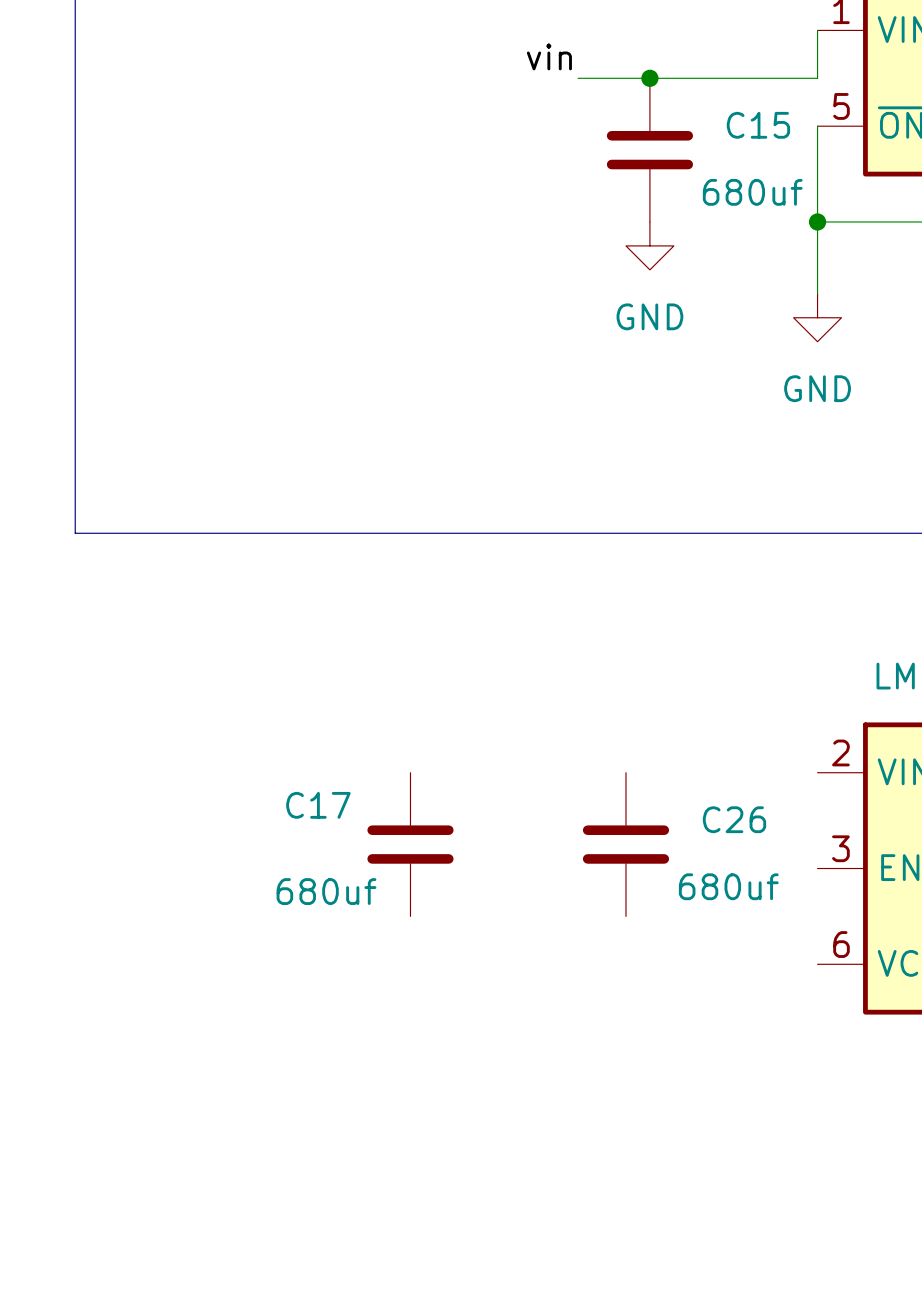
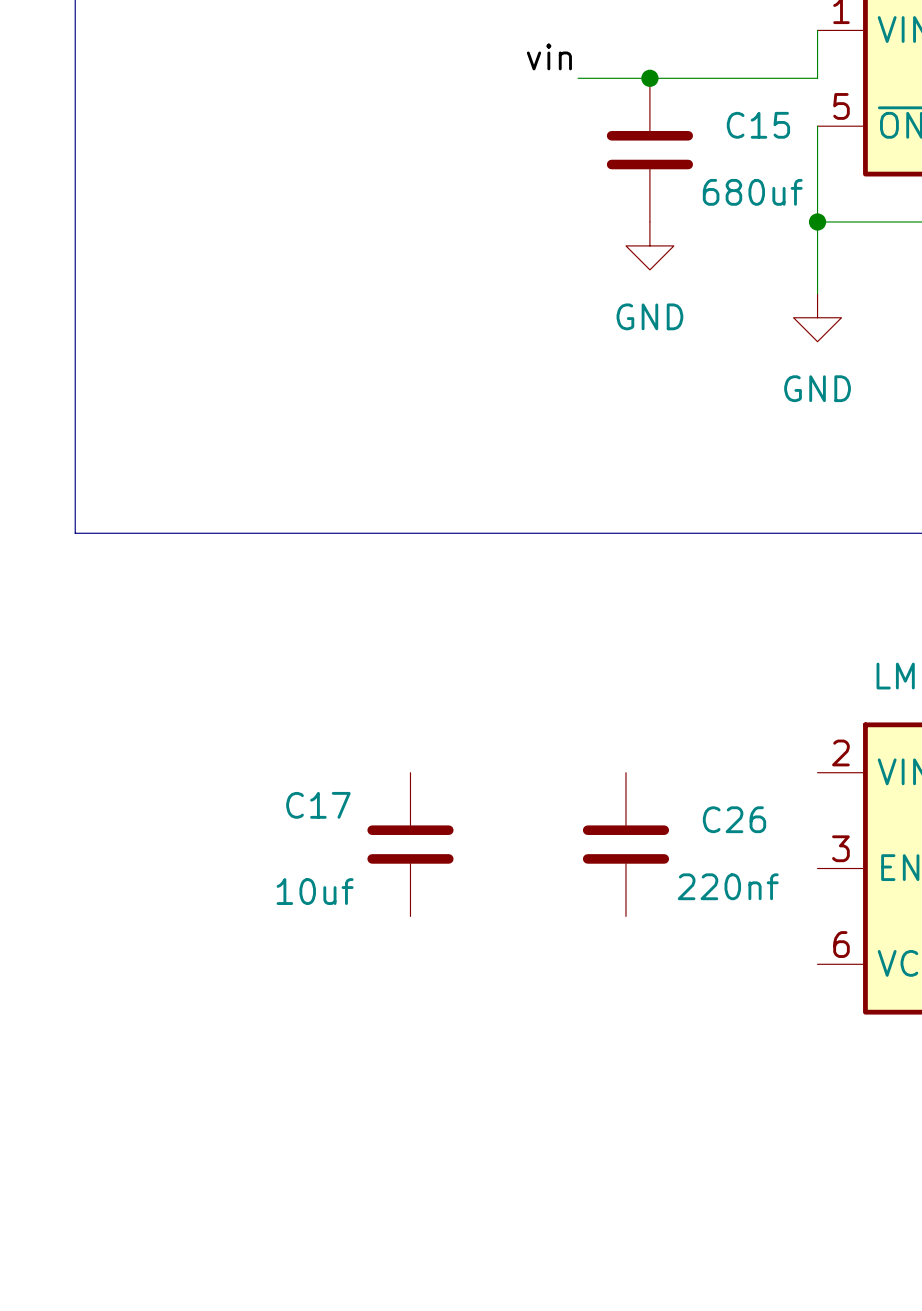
C26 value: 680uf (728, 886) -> 220nf (728, 886)
C17 value: 680uf (326, 891) -> 10uf (315, 891)

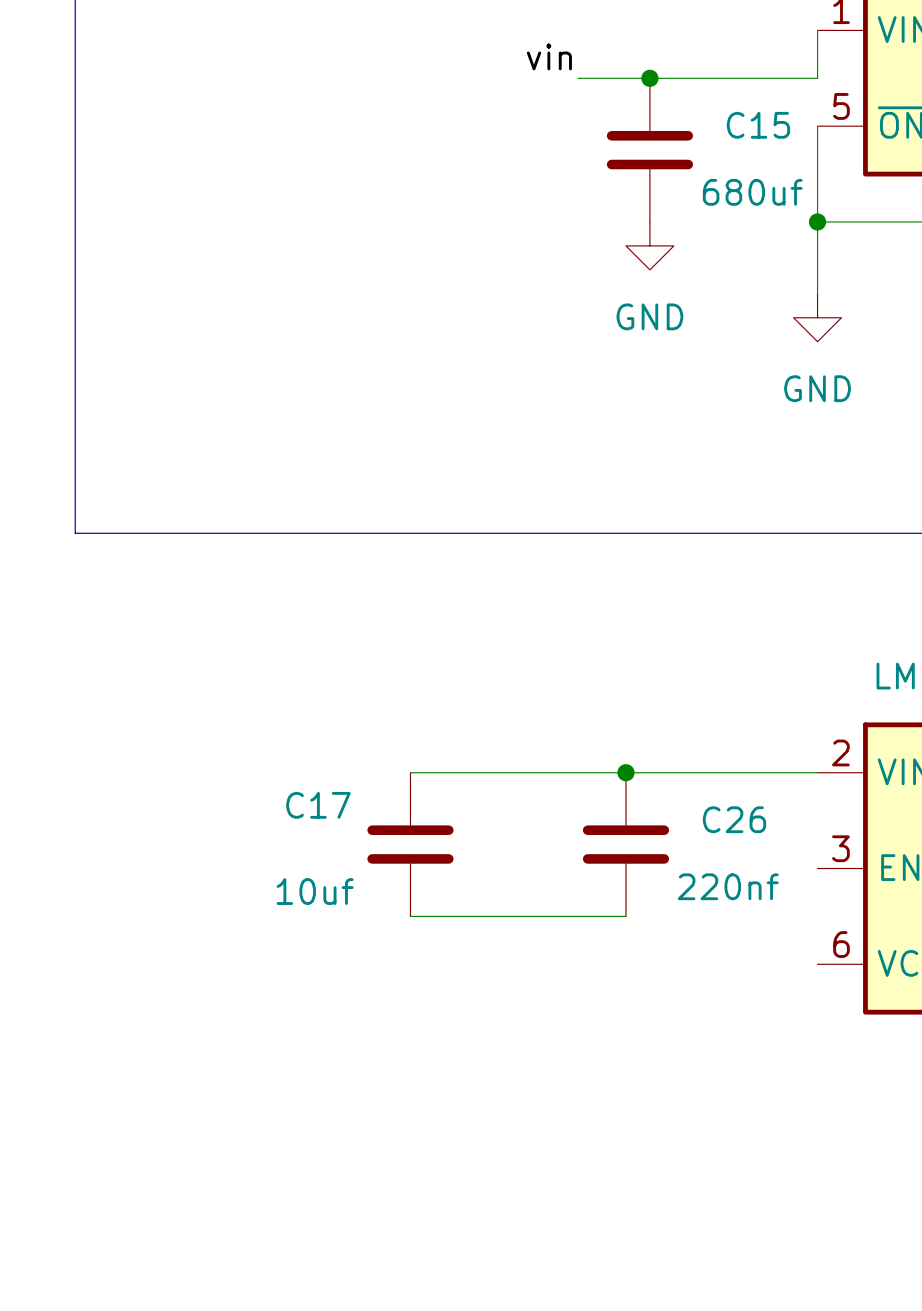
wire: none -> (410, 772) (817, 772)
junction: none -> (625, 772)
wire: none -> (410, 916) (625, 916)

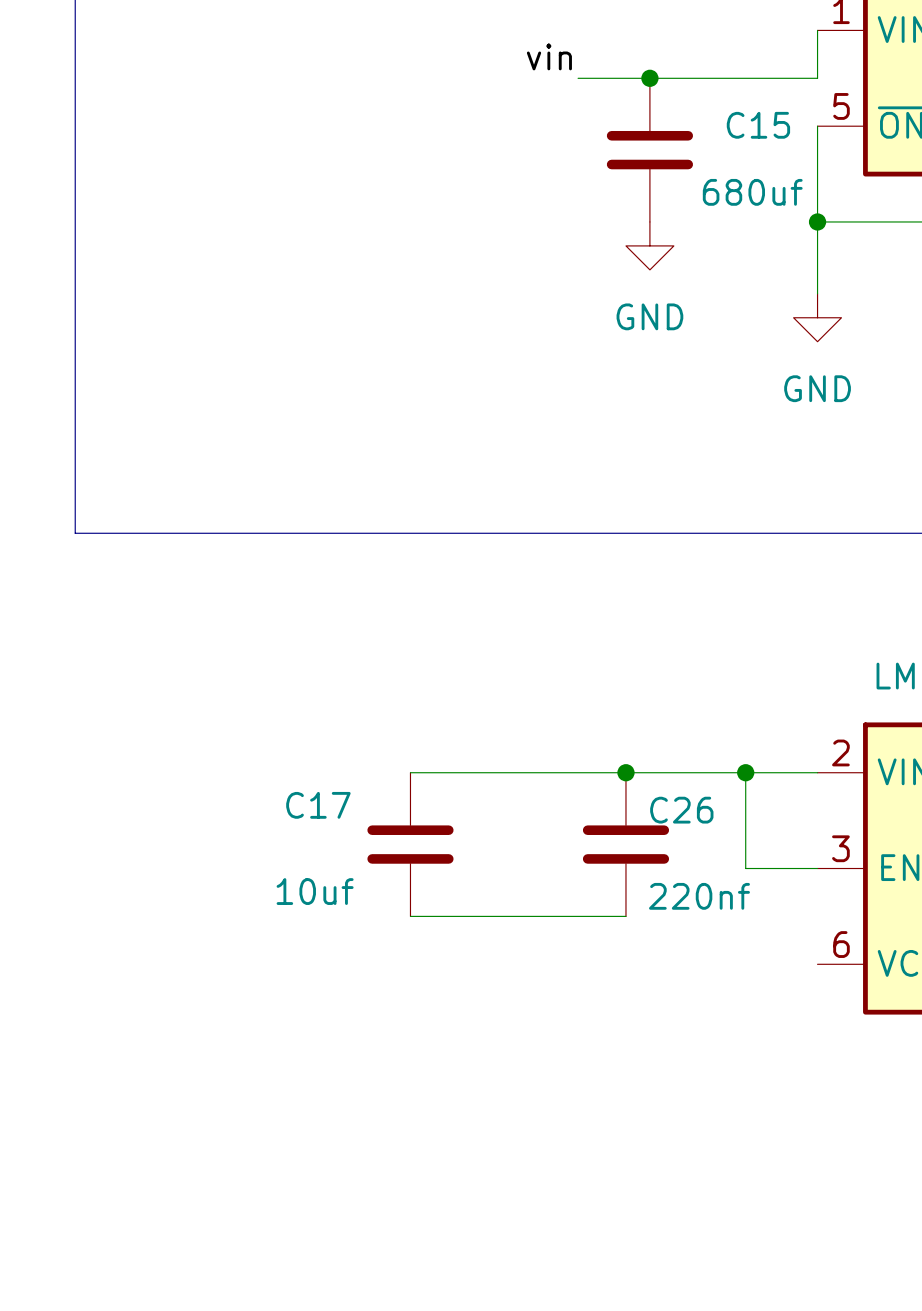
wire: none -> (745, 772) (745, 868) (817, 868)
junction: none -> (745, 772)
C26 name position: C26 (734, 819) -> C26 (681, 810)
C26 value position: 220nf (728, 886) -> 220nf (699, 896)

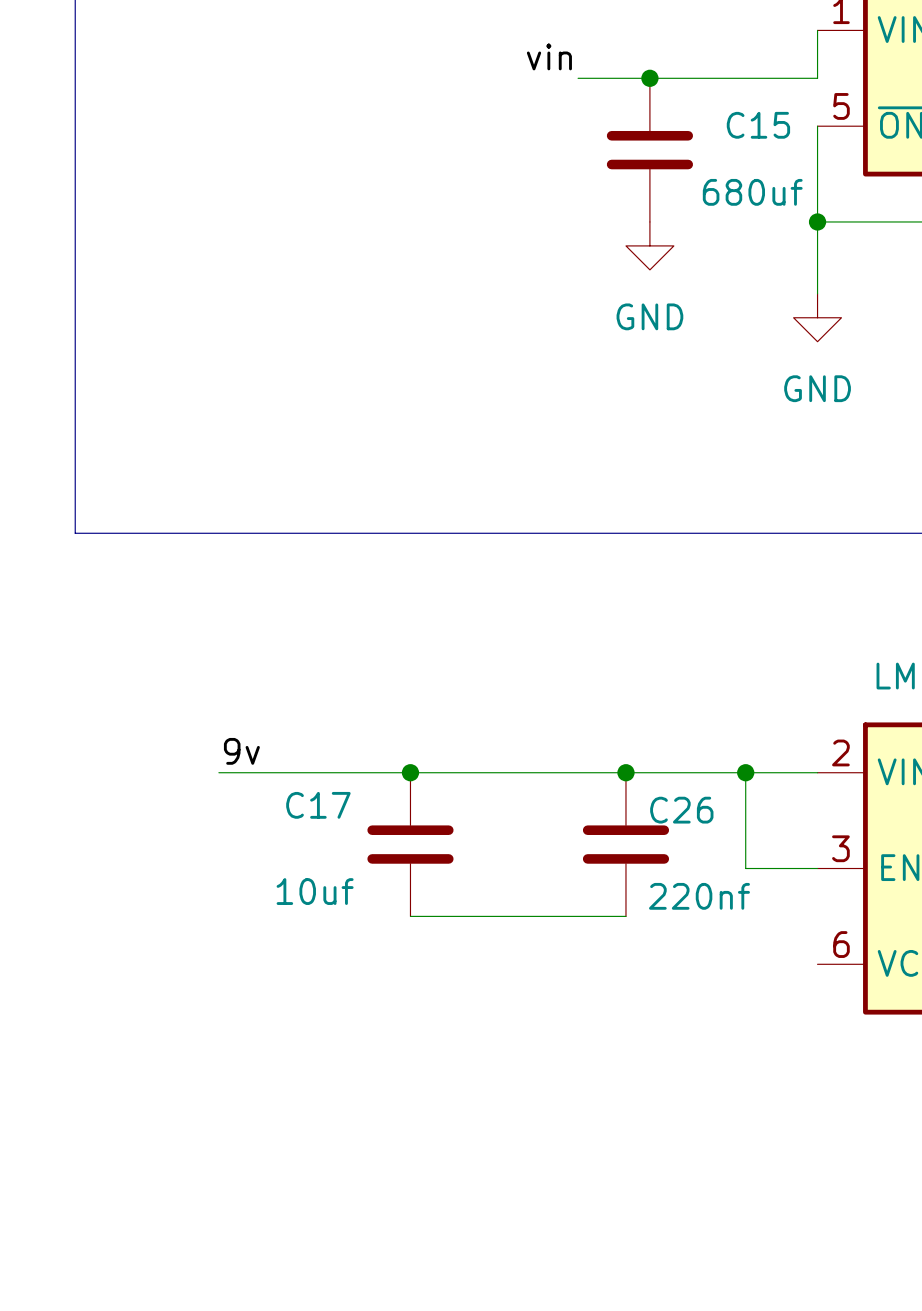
label: none -> 9v (241, 751)
wire: none -> (218, 772) (410, 772)
junction: none -> (410, 772)

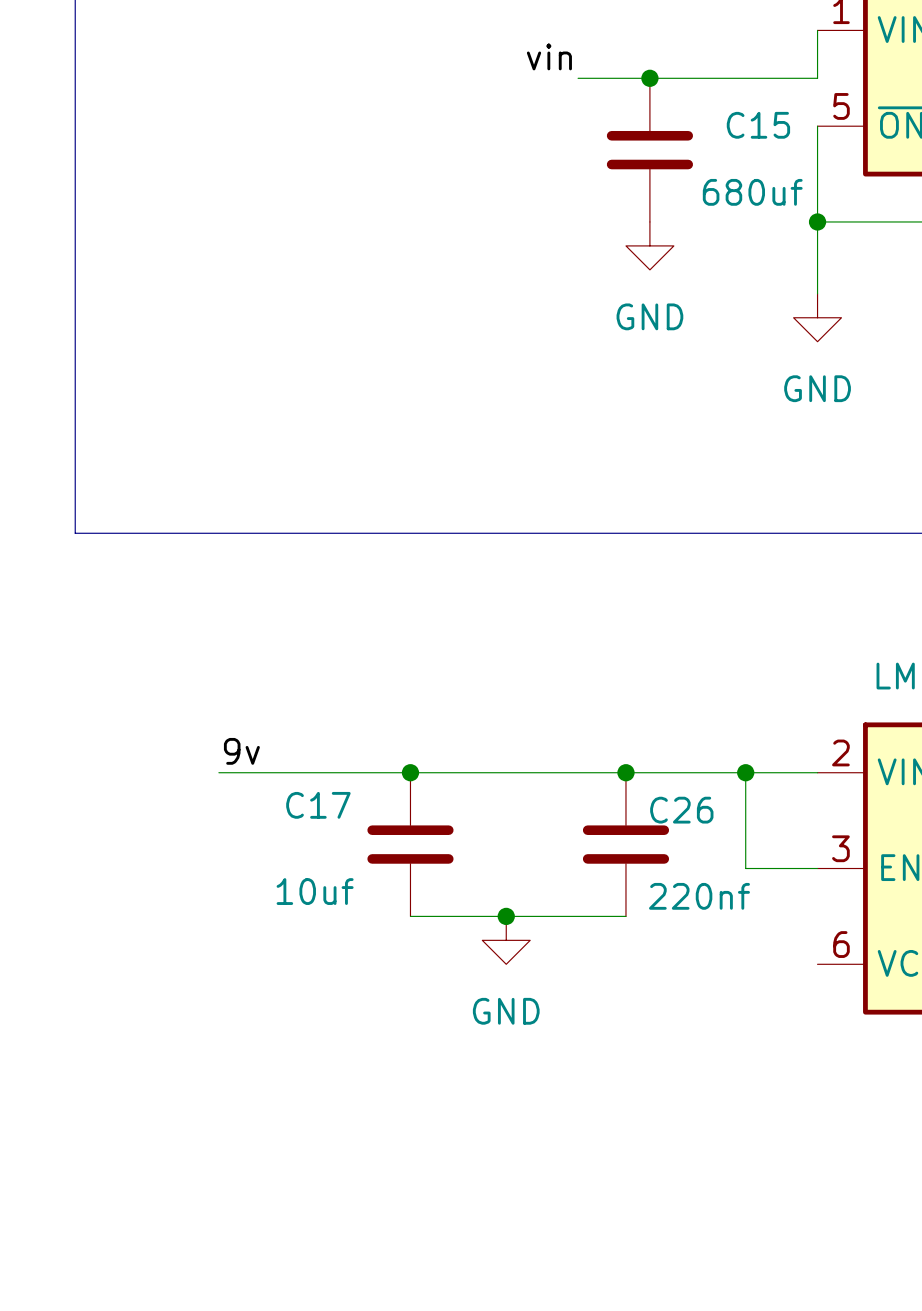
junction: none -> (506, 916)
power symbol: none -> GND (506, 940)

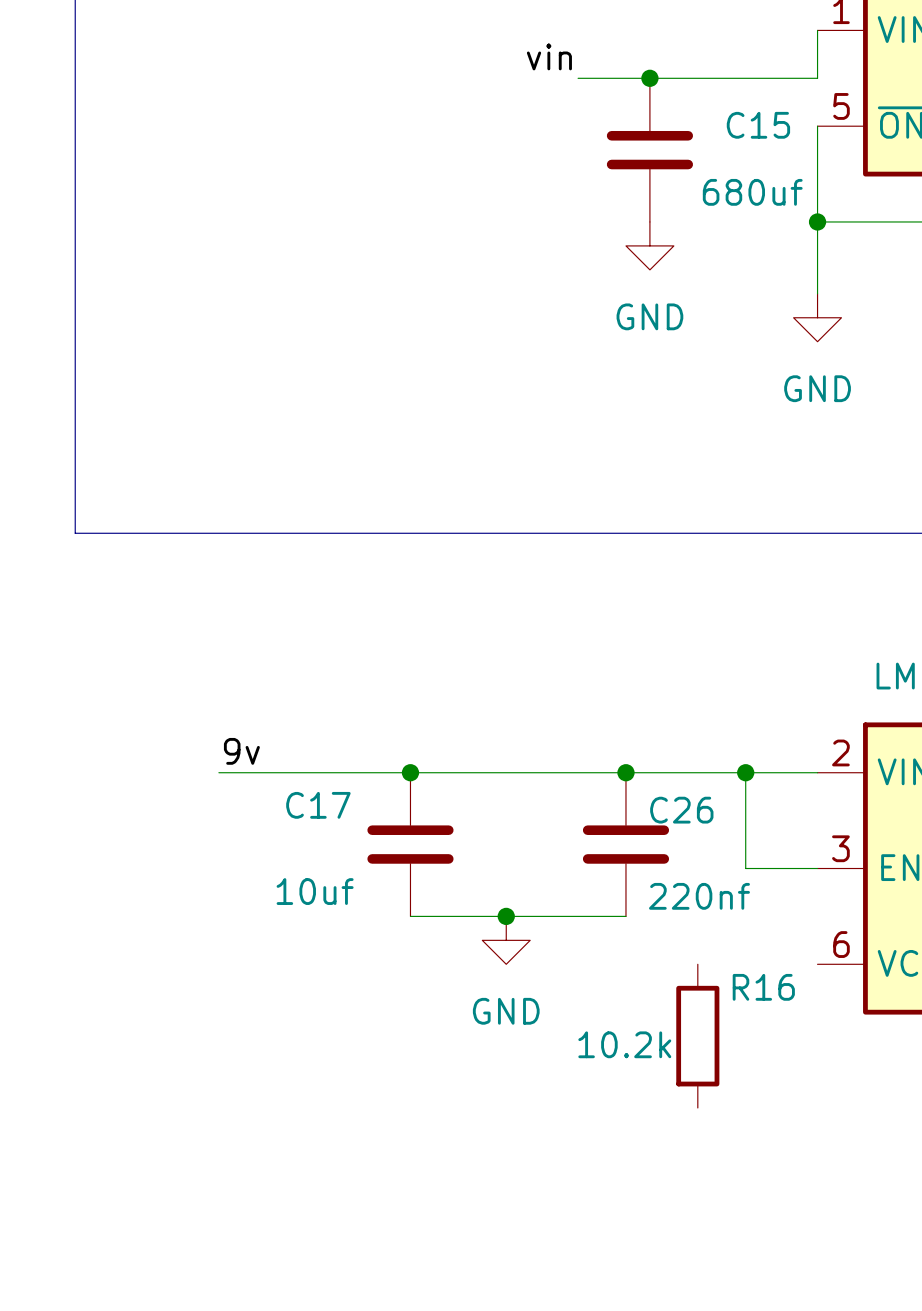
R16: none -> 10.2k (697, 1036)

